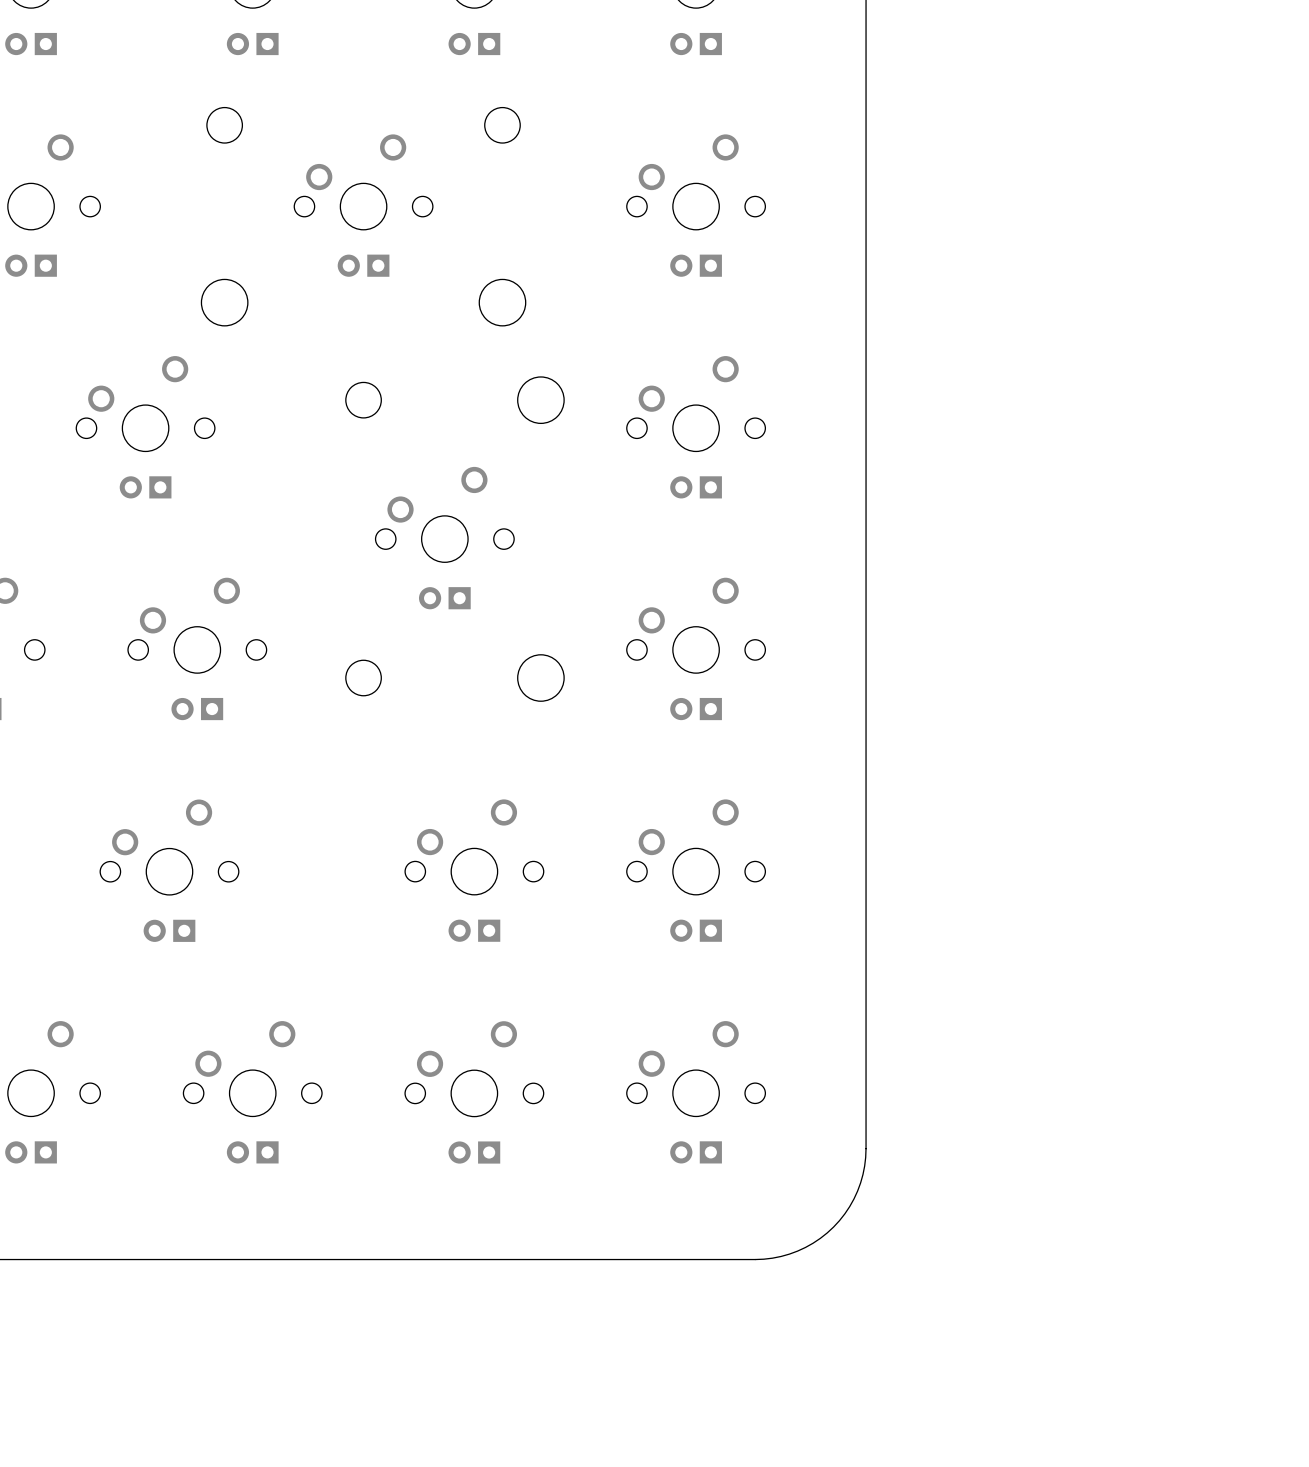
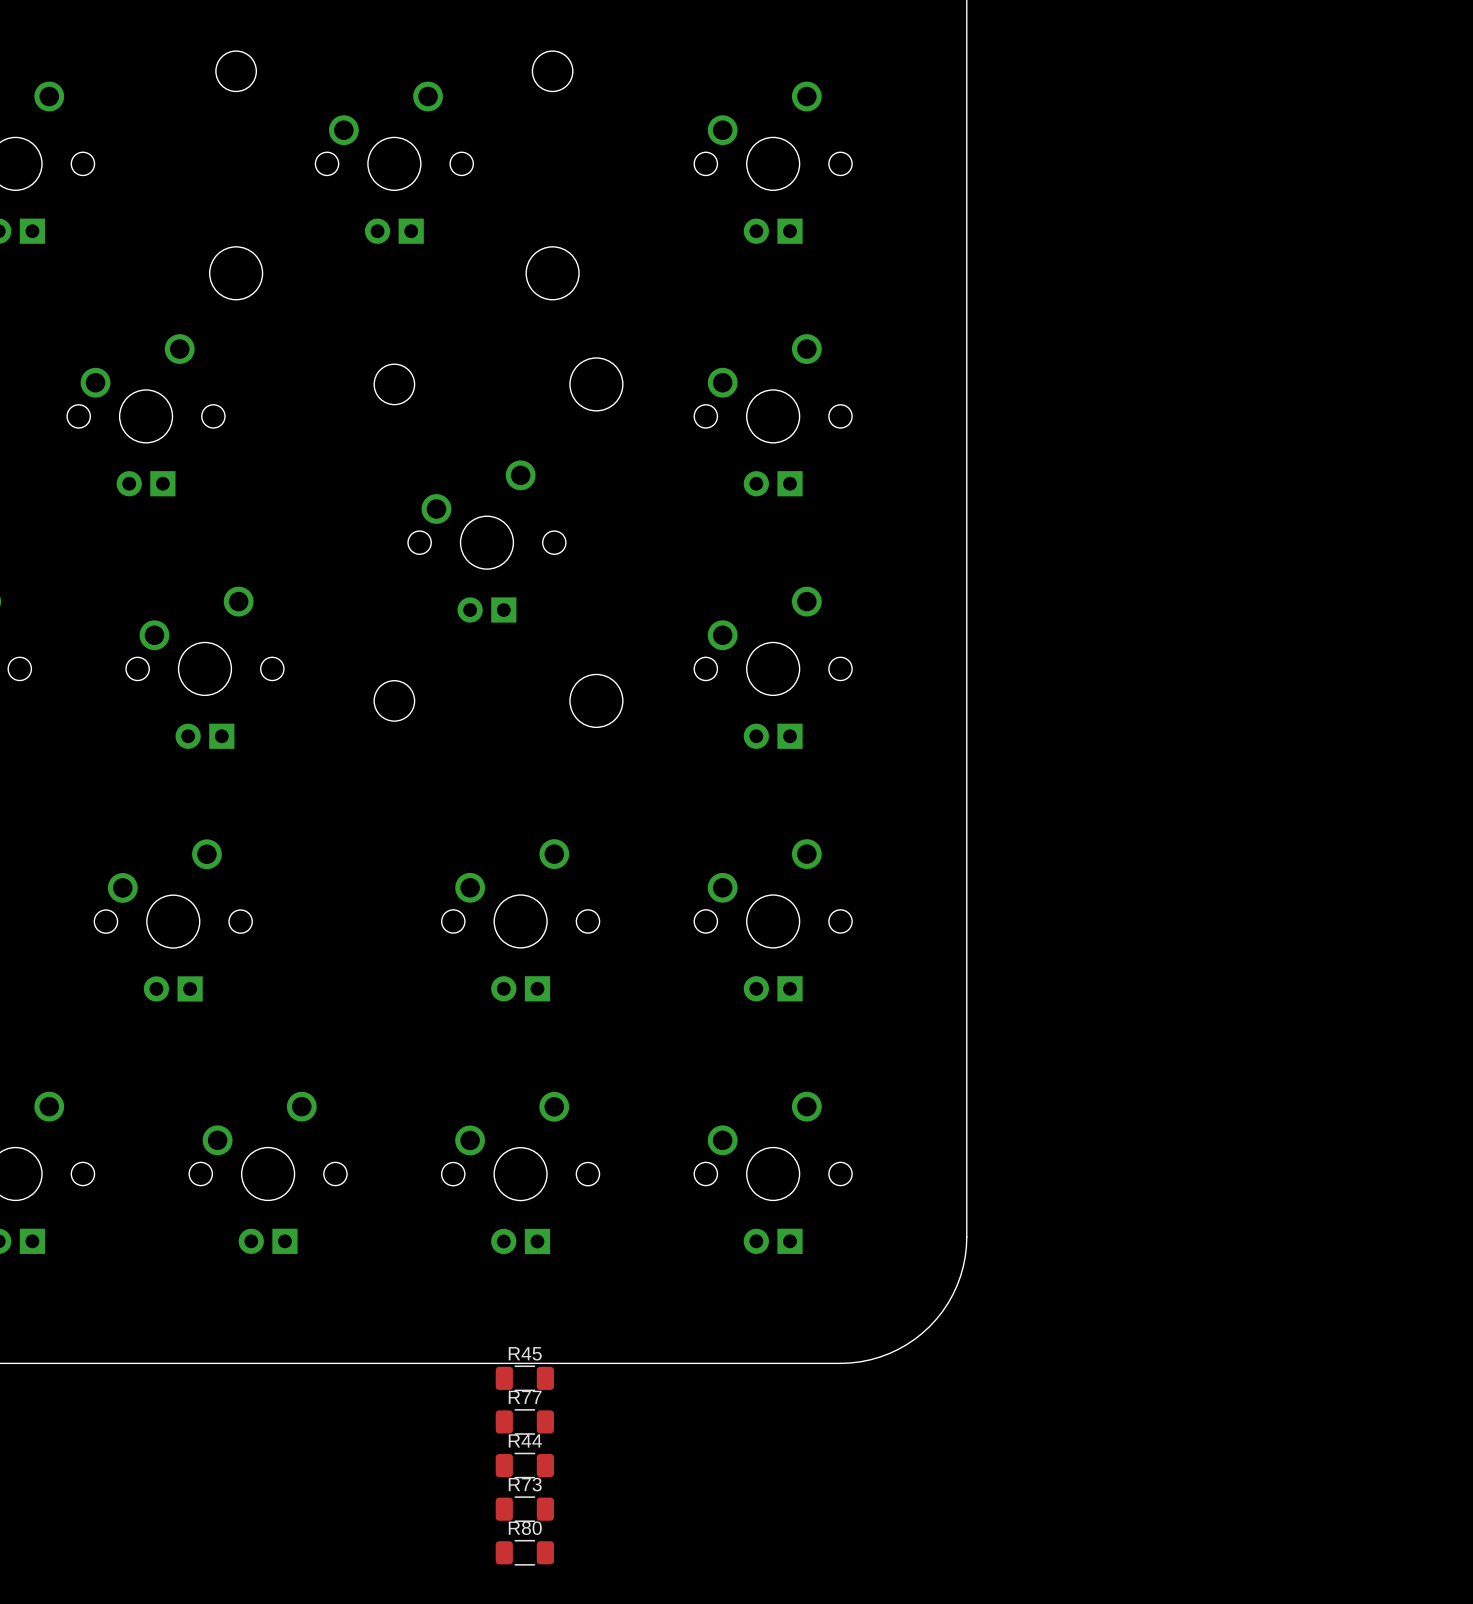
R45: none -> (524, 1378)
R77: none -> (524, 1421)
R44: none -> (524, 1465)
R73: none -> (524, 1509)
R80: none -> (524, 1552)

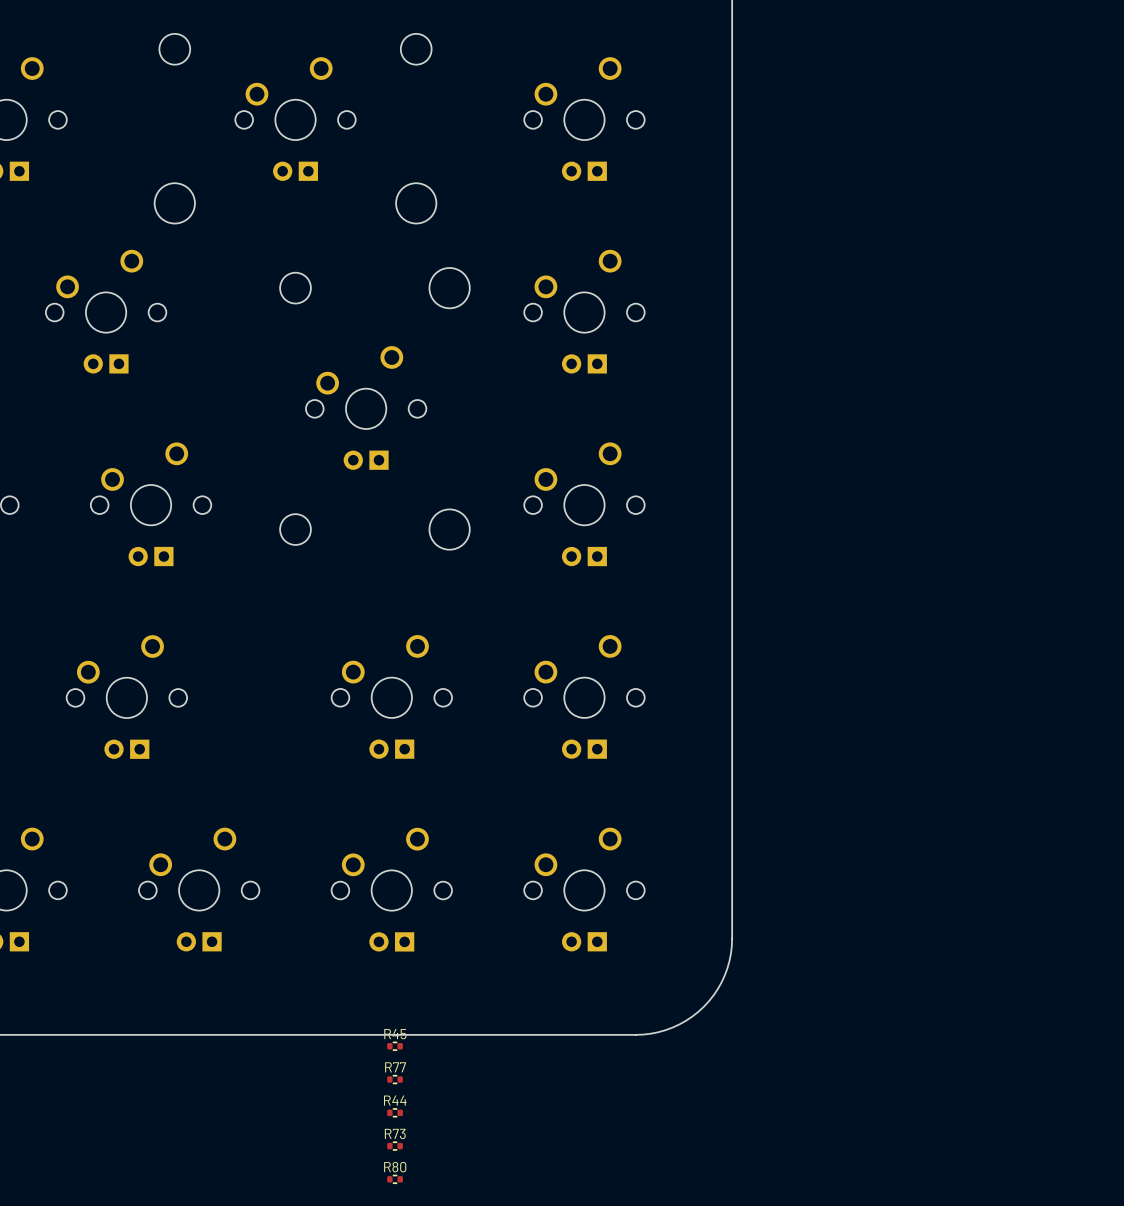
R45 footprint: [495, 1365, 555, 1392] -> [387, 1041, 403, 1051]
R77 footprint: [495, 1409, 555, 1435] -> [387, 1075, 403, 1085]
R44 footprint: [495, 1452, 555, 1479] -> [387, 1108, 403, 1118]
R73 footprint: [495, 1496, 555, 1523] -> [387, 1141, 403, 1151]
R80 footprint: [495, 1539, 555, 1566] -> [387, 1174, 403, 1184]

